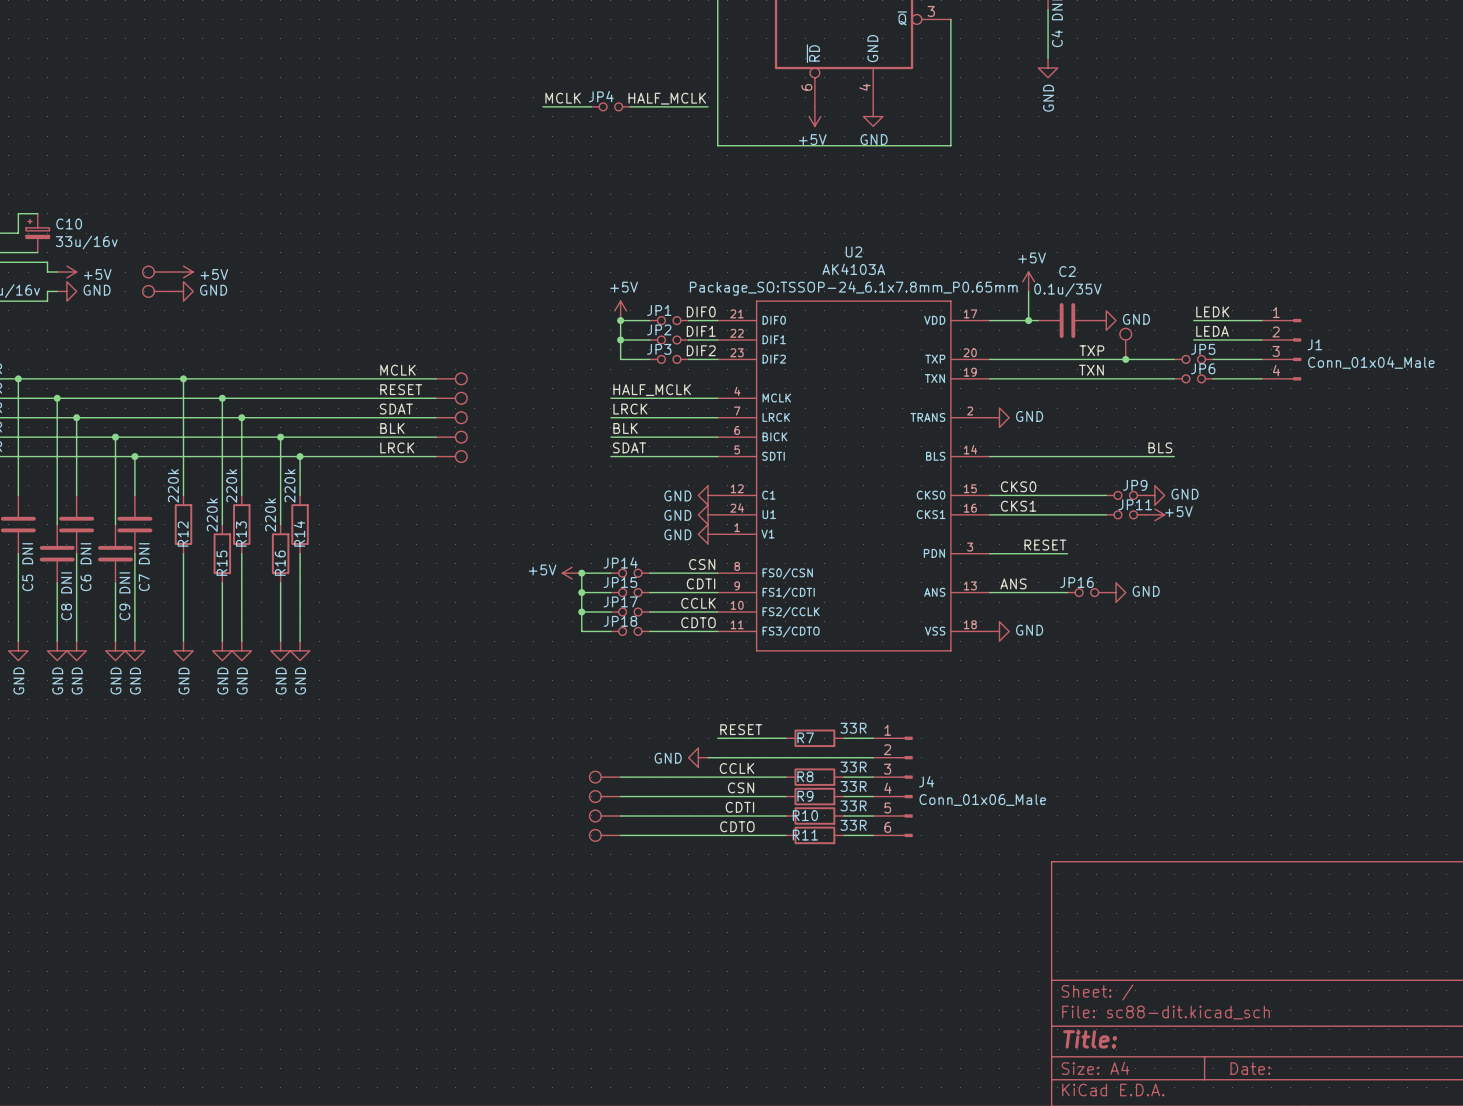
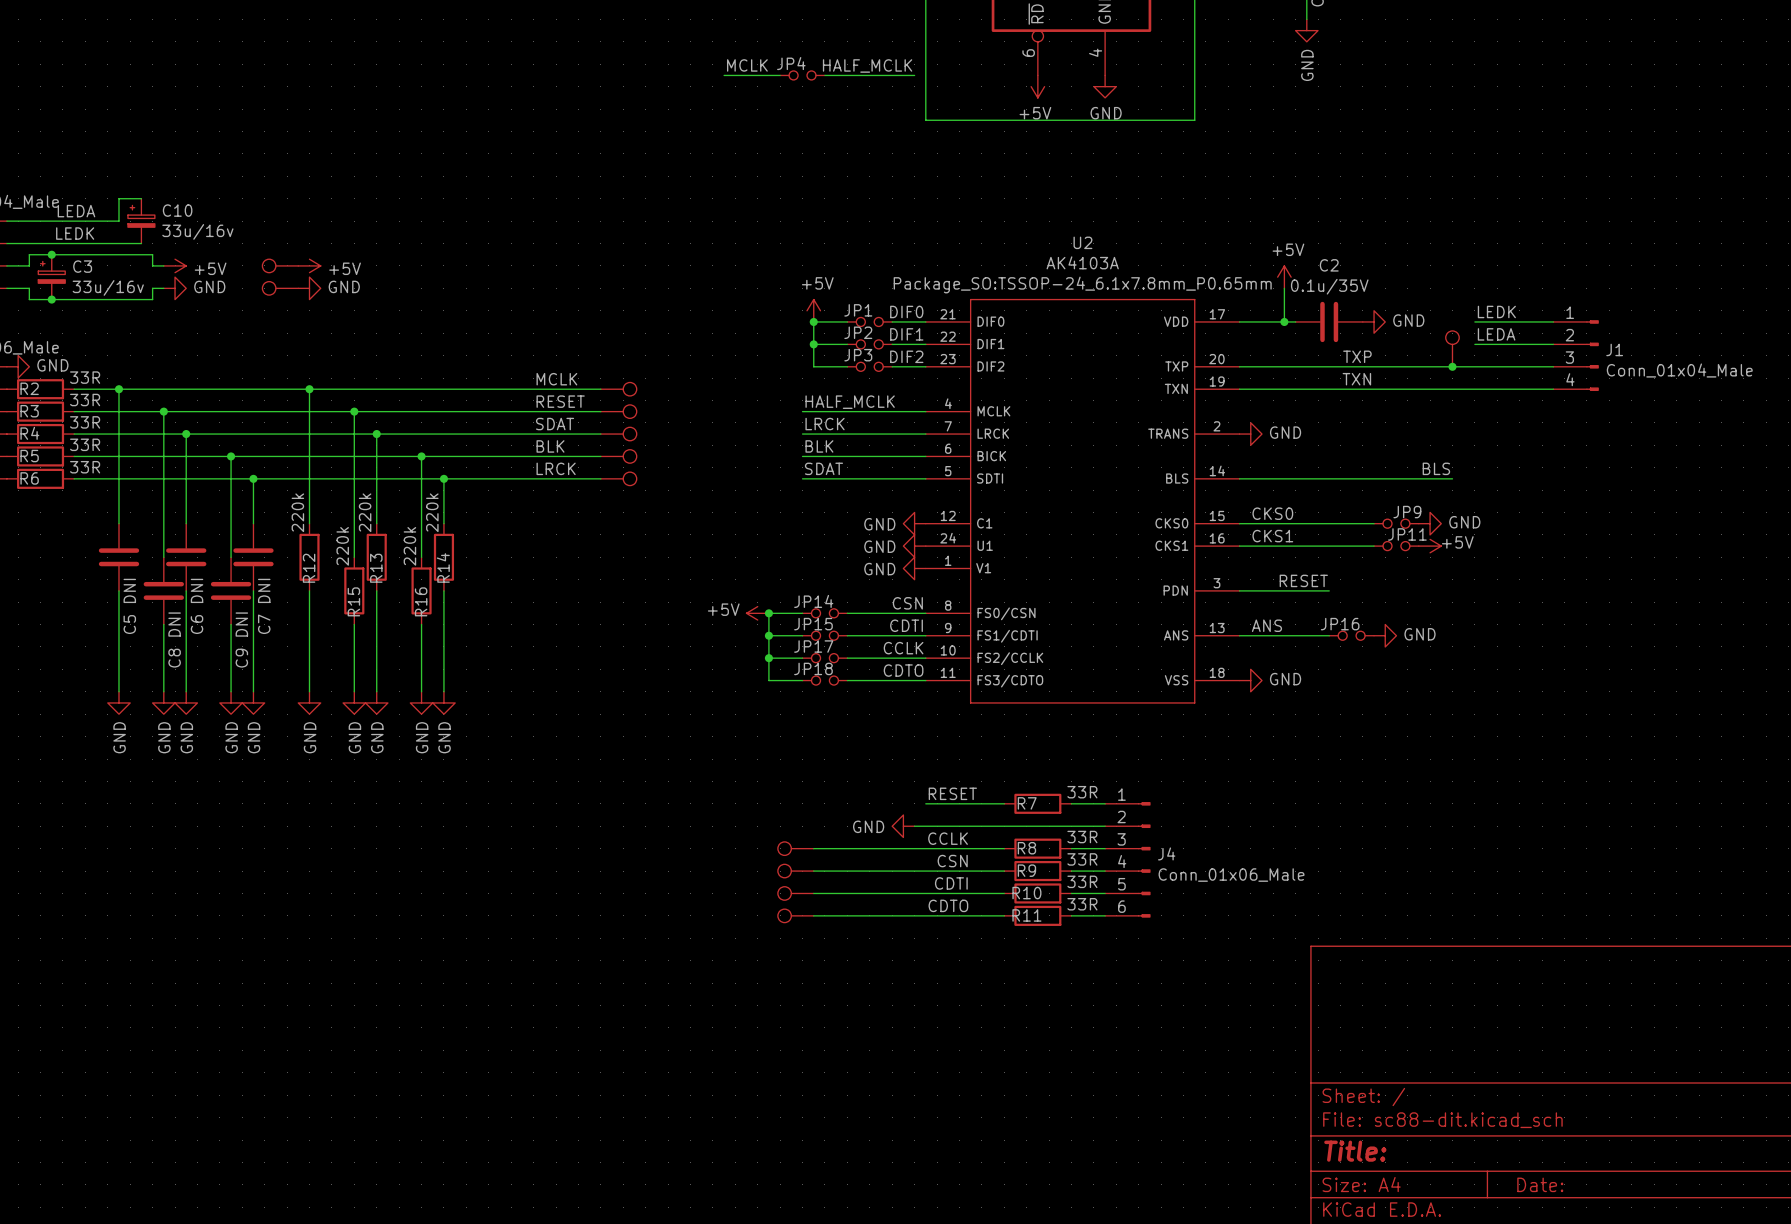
part position: (1125, 343) -> (1452, 348)
junction: (1125, 359) -> none
wire: none -> (1452, 366) (1497, 366)
junction: none -> (1452, 366)
JP5: (1193, 359) -> none
wire: none -> (1452, 389) (1497, 389)
JP6: (1193, 378) -> none

